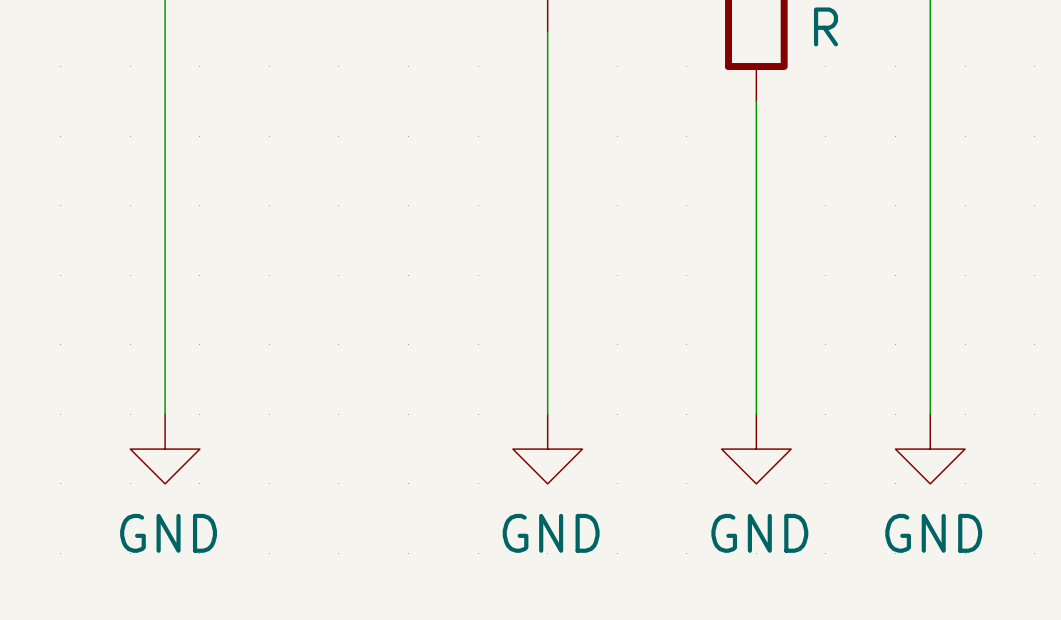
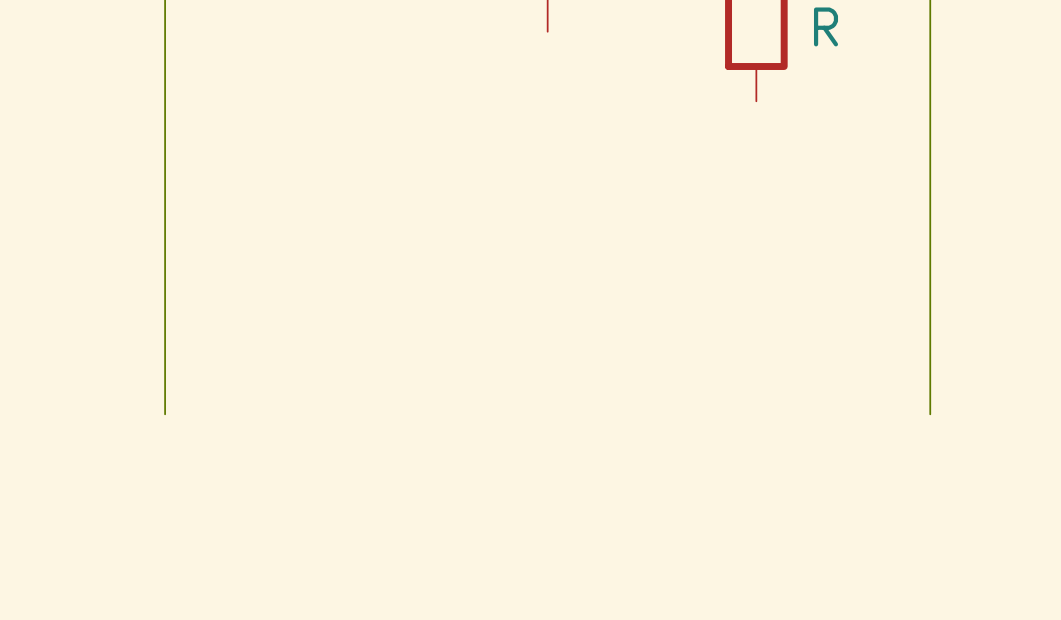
wire: (547, 31) (547, 414) -> none
wire: (756, 101) (756, 414) -> none
power symbol: GND (165, 449) -> none
power symbol: GND (547, 449) -> none
power symbol: GND (756, 449) -> none
power symbol: GND (930, 449) -> none

